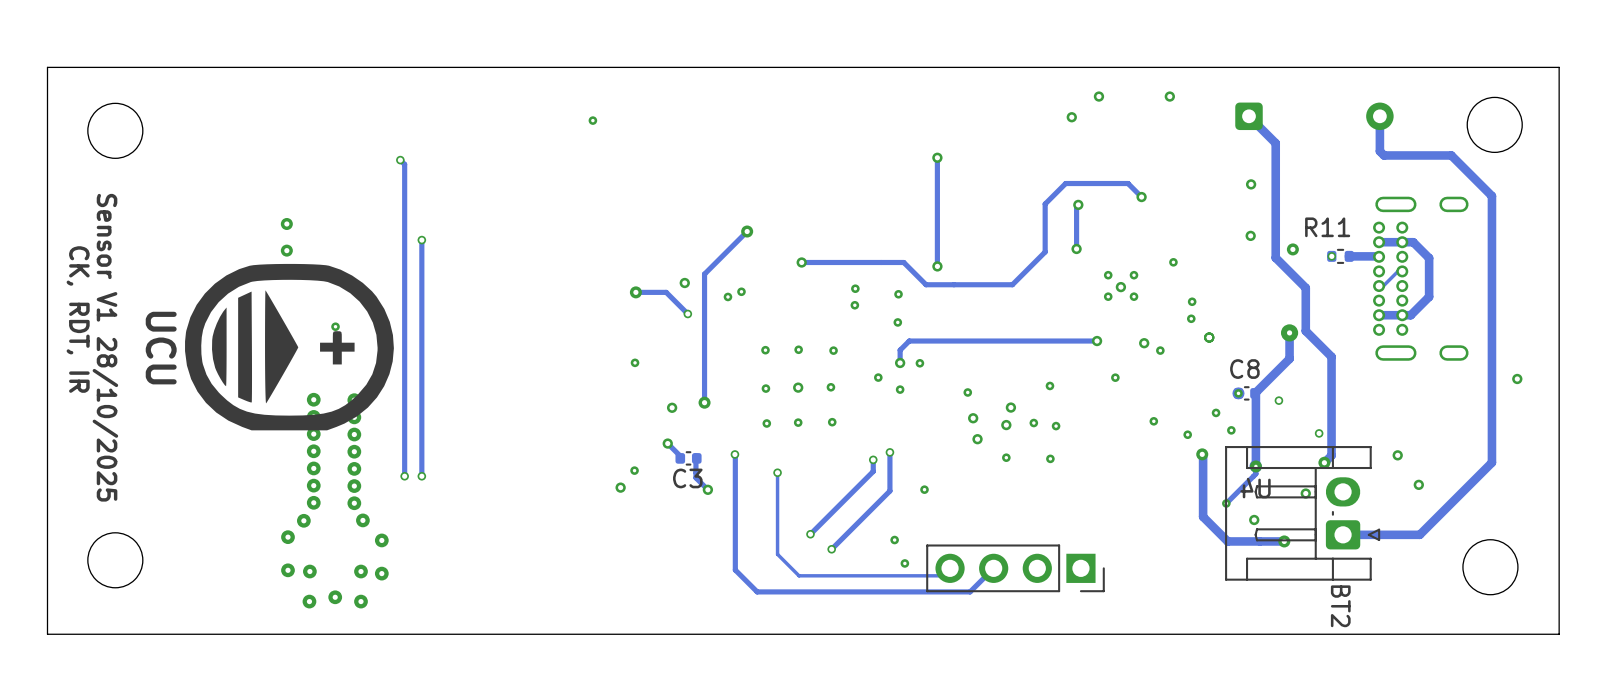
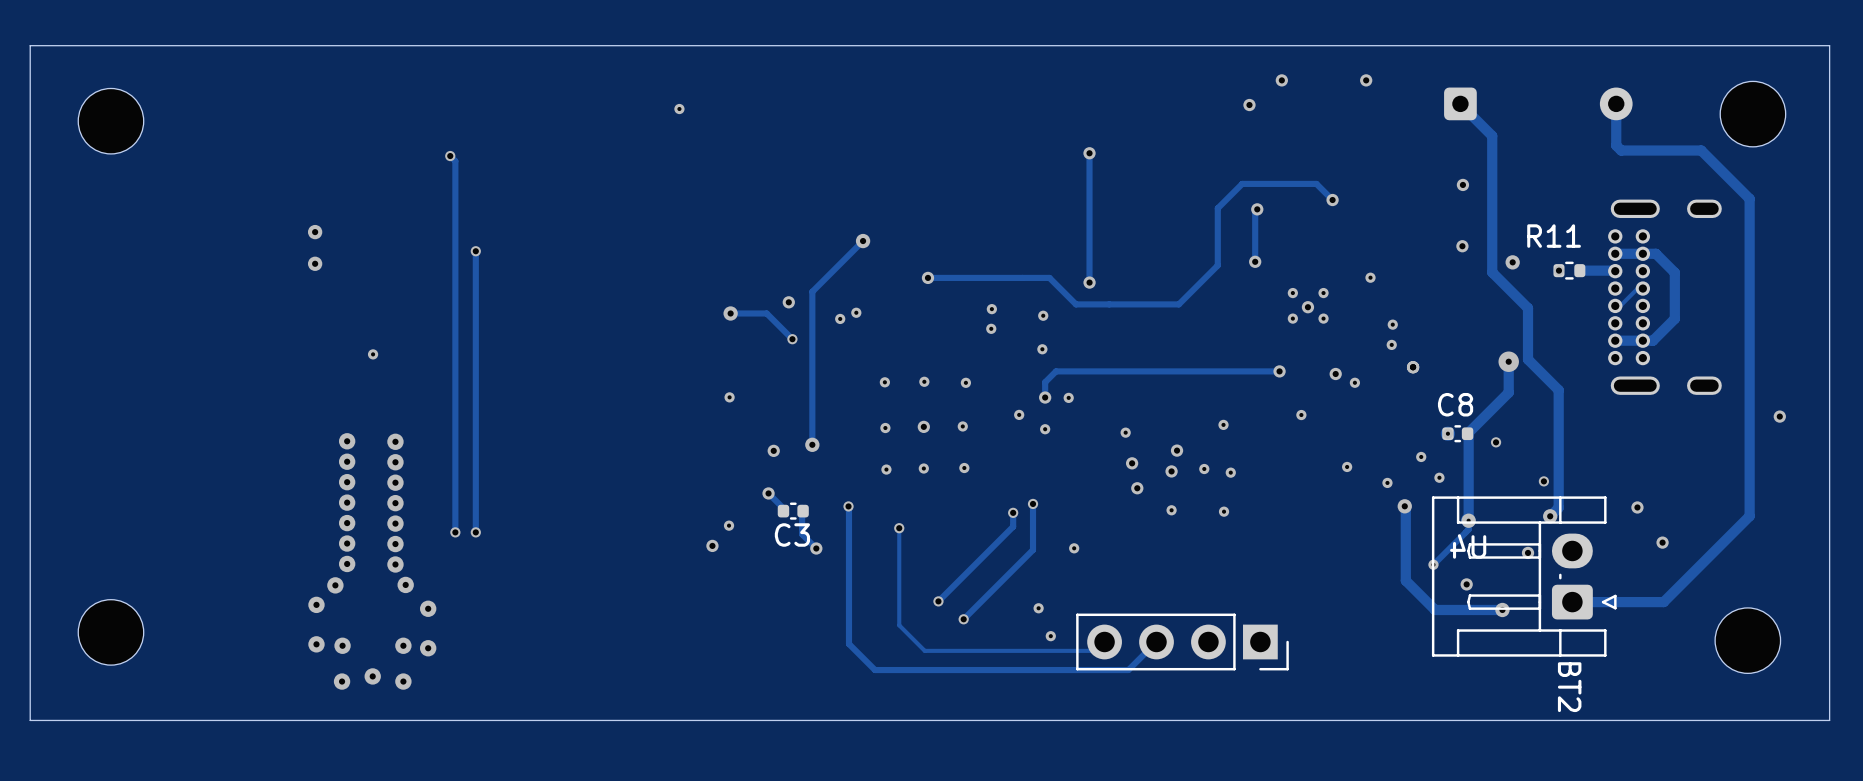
text: CK, RDT, IR (78, 319) -> none
text: Sensor V1 28/10/2025 (105, 347) -> none
UCU: (289, 347) -> none

